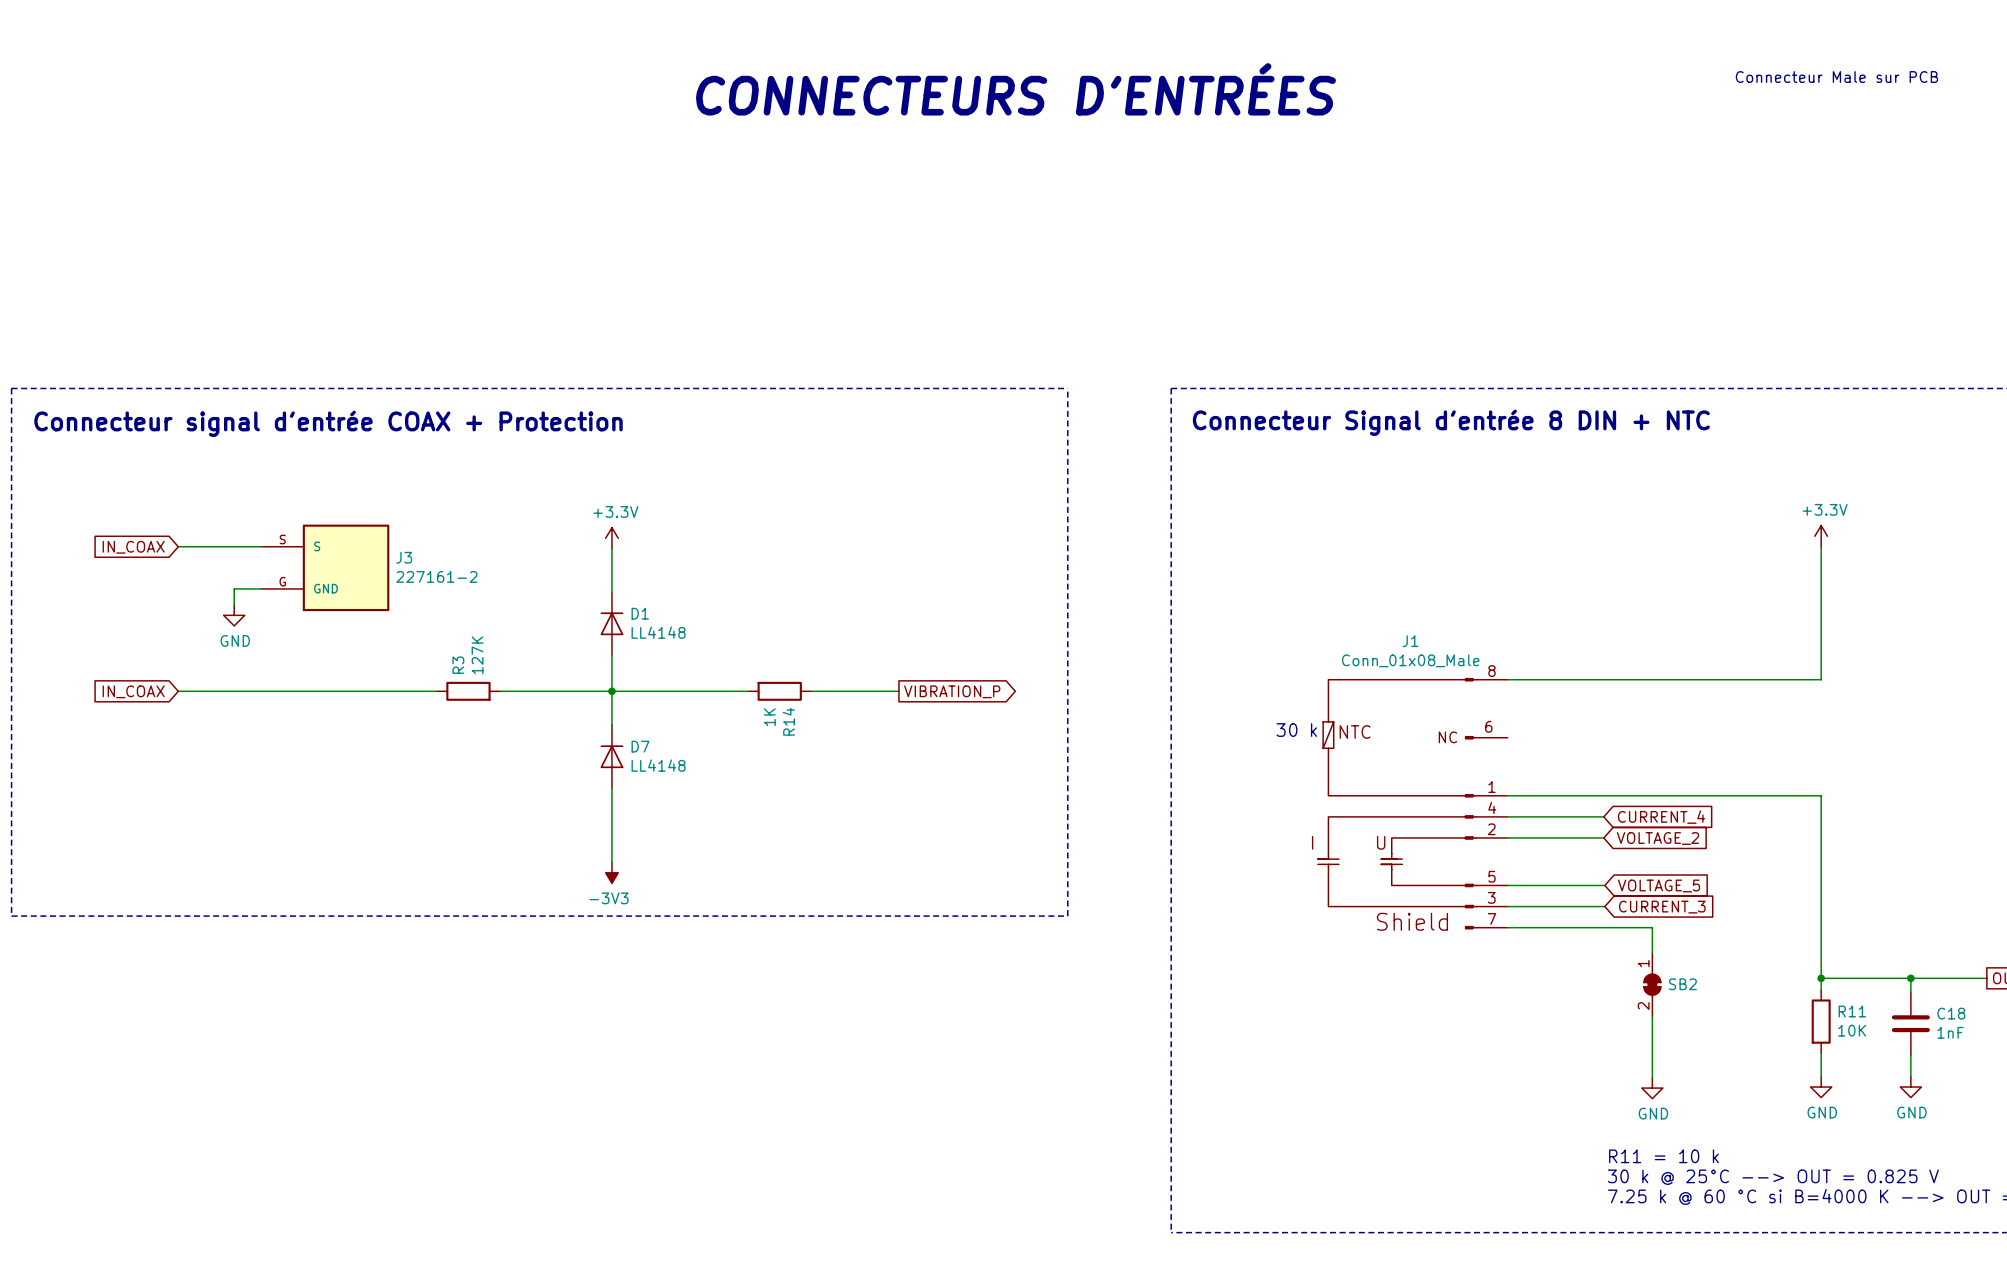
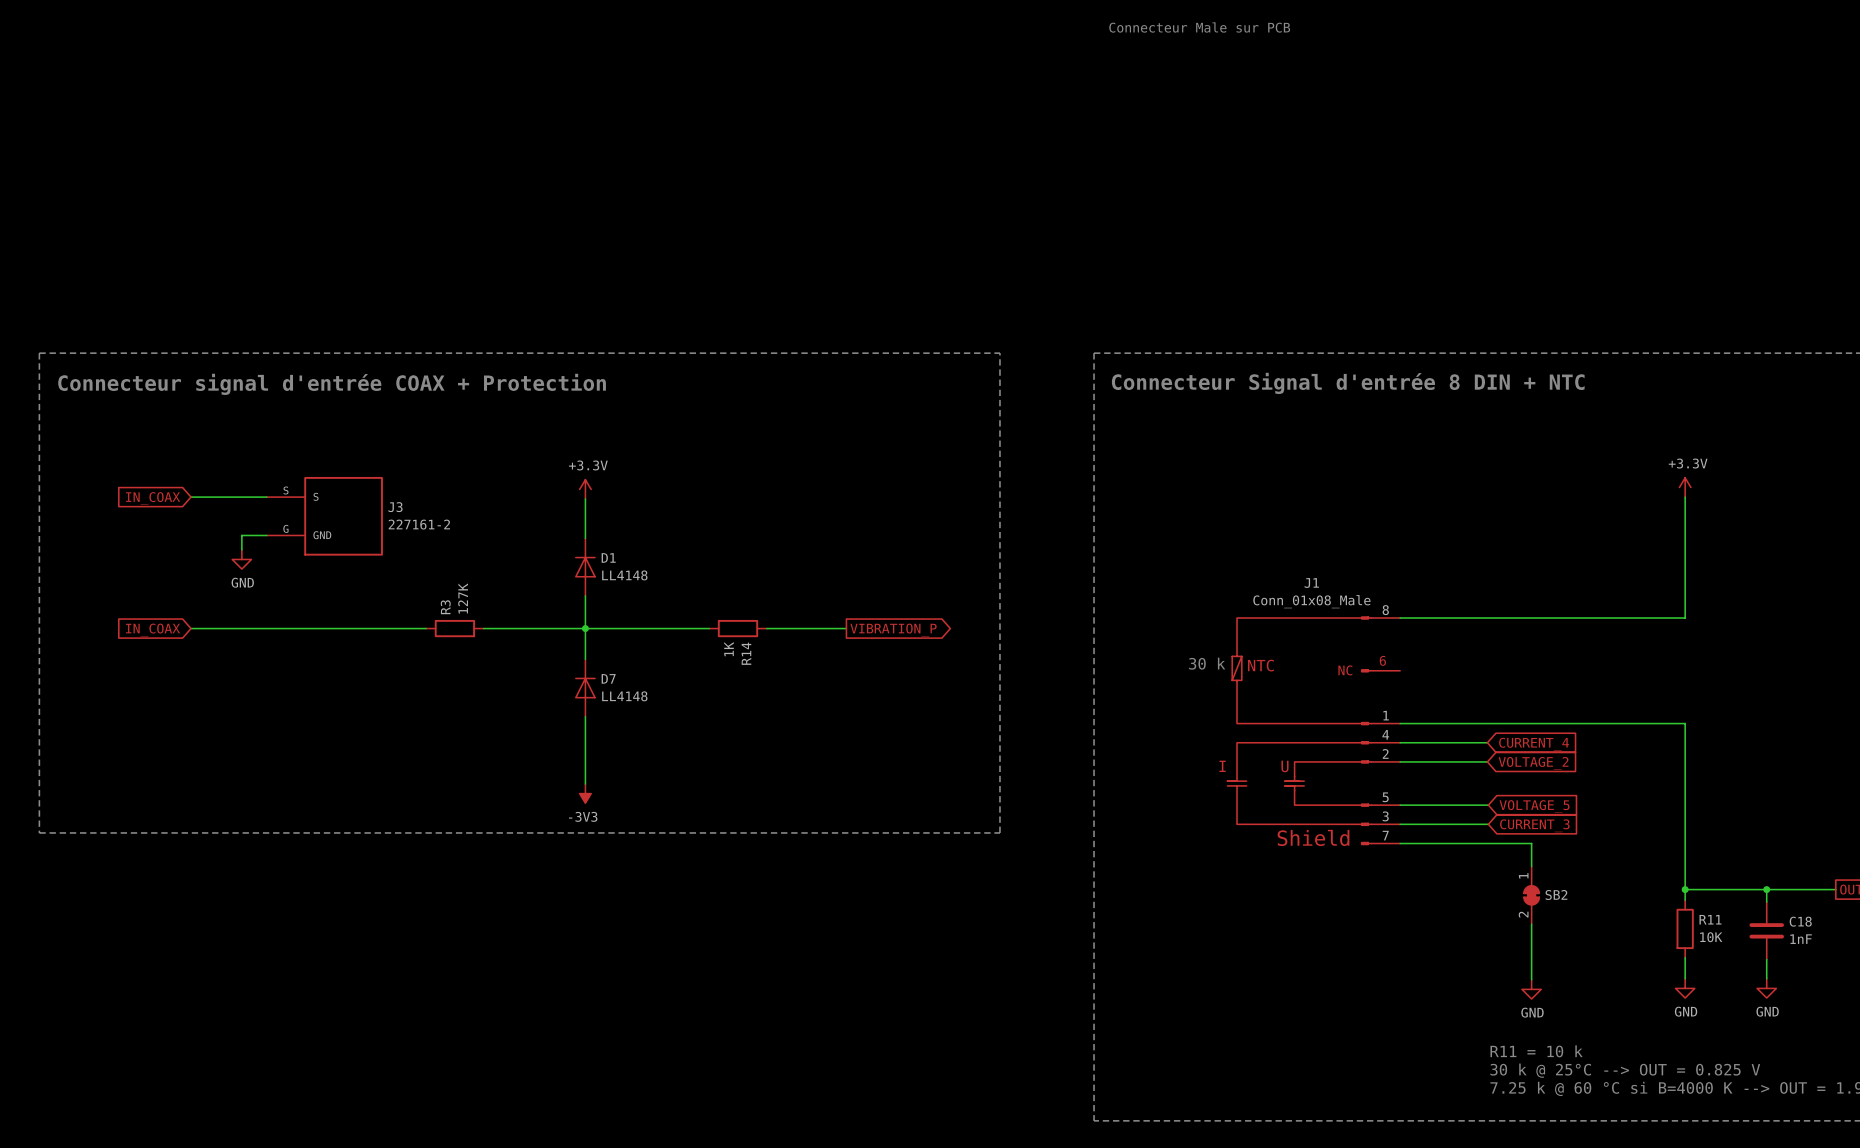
text: none -> Connecteur Male sur PCB (1199, 27)
text: Connecteur Male sur PCB (1836, 77) -> none
text: CONNECTEURS D'ENTRÉES (1015, 89) -> none

